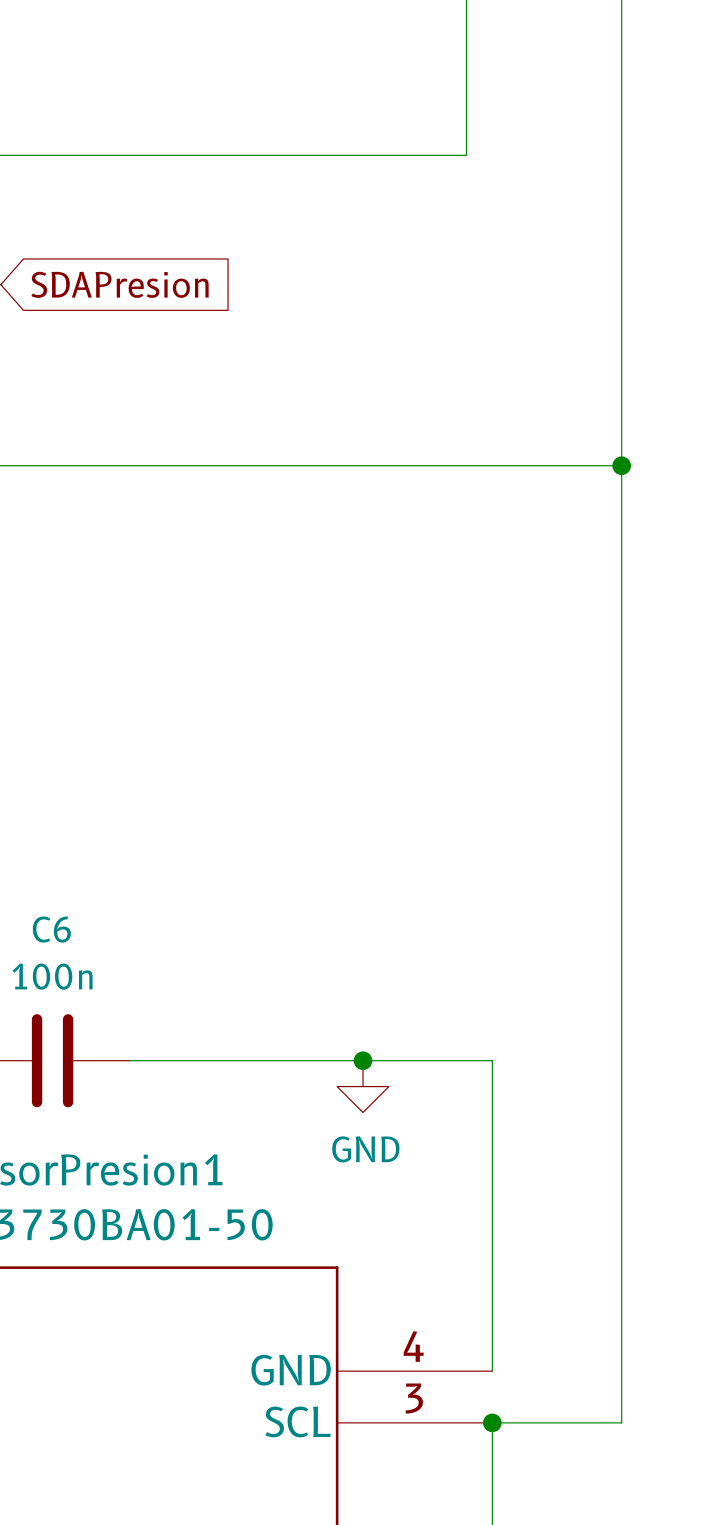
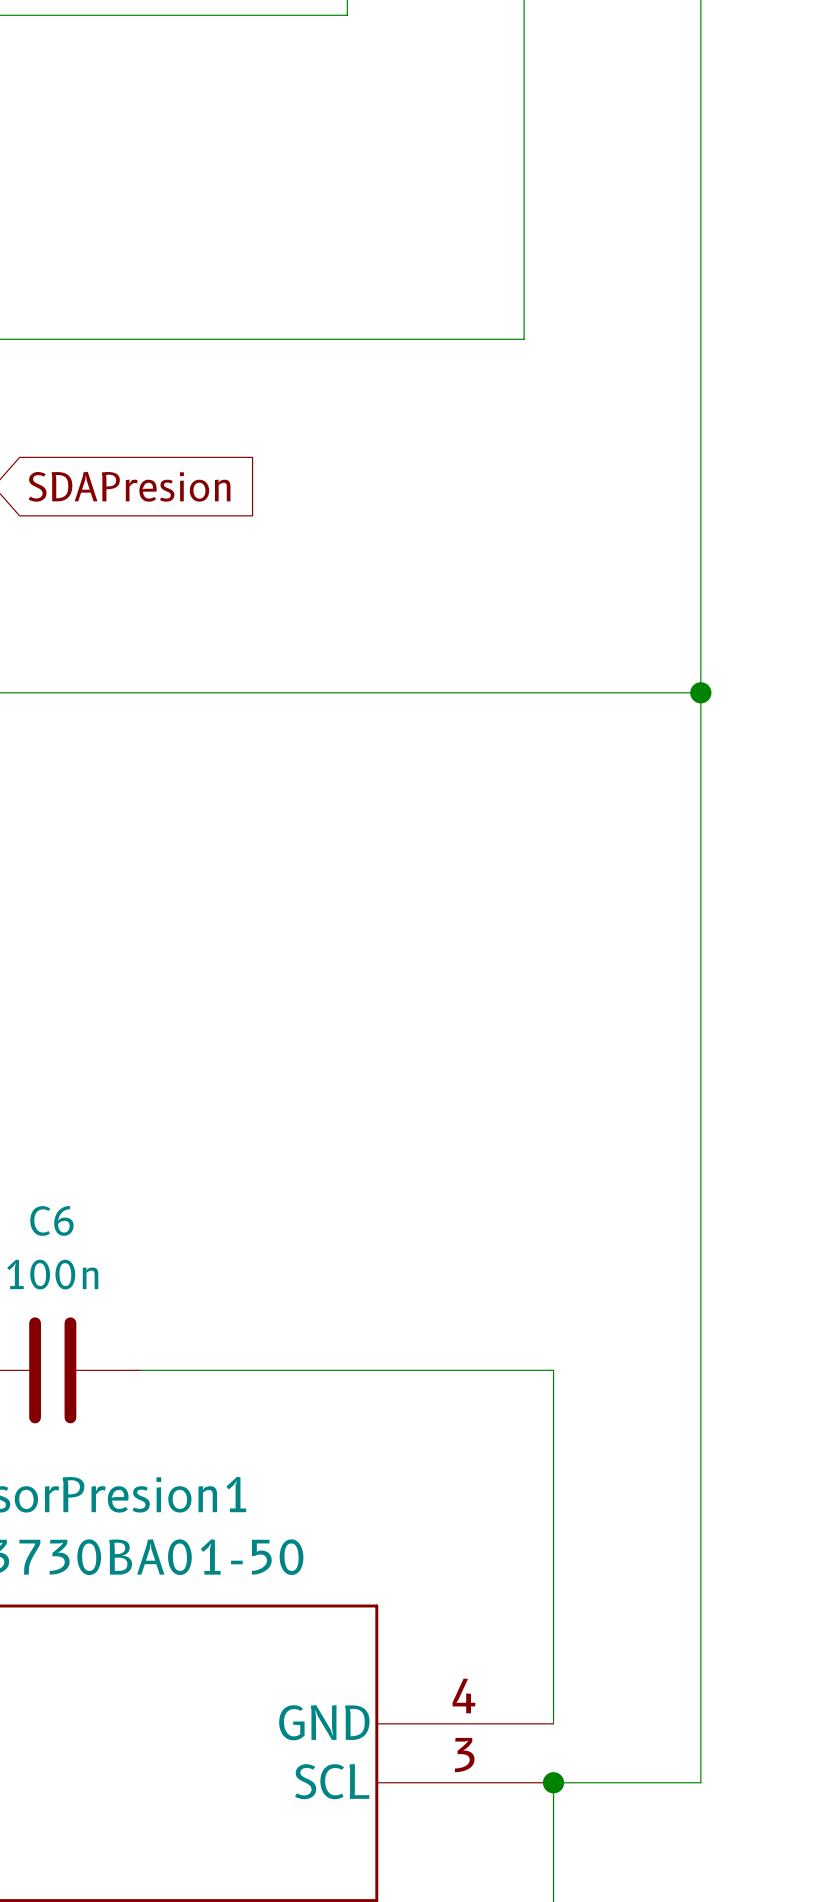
junction: (363, 1060) -> none
power symbol: GND (363, 1086) -> none

